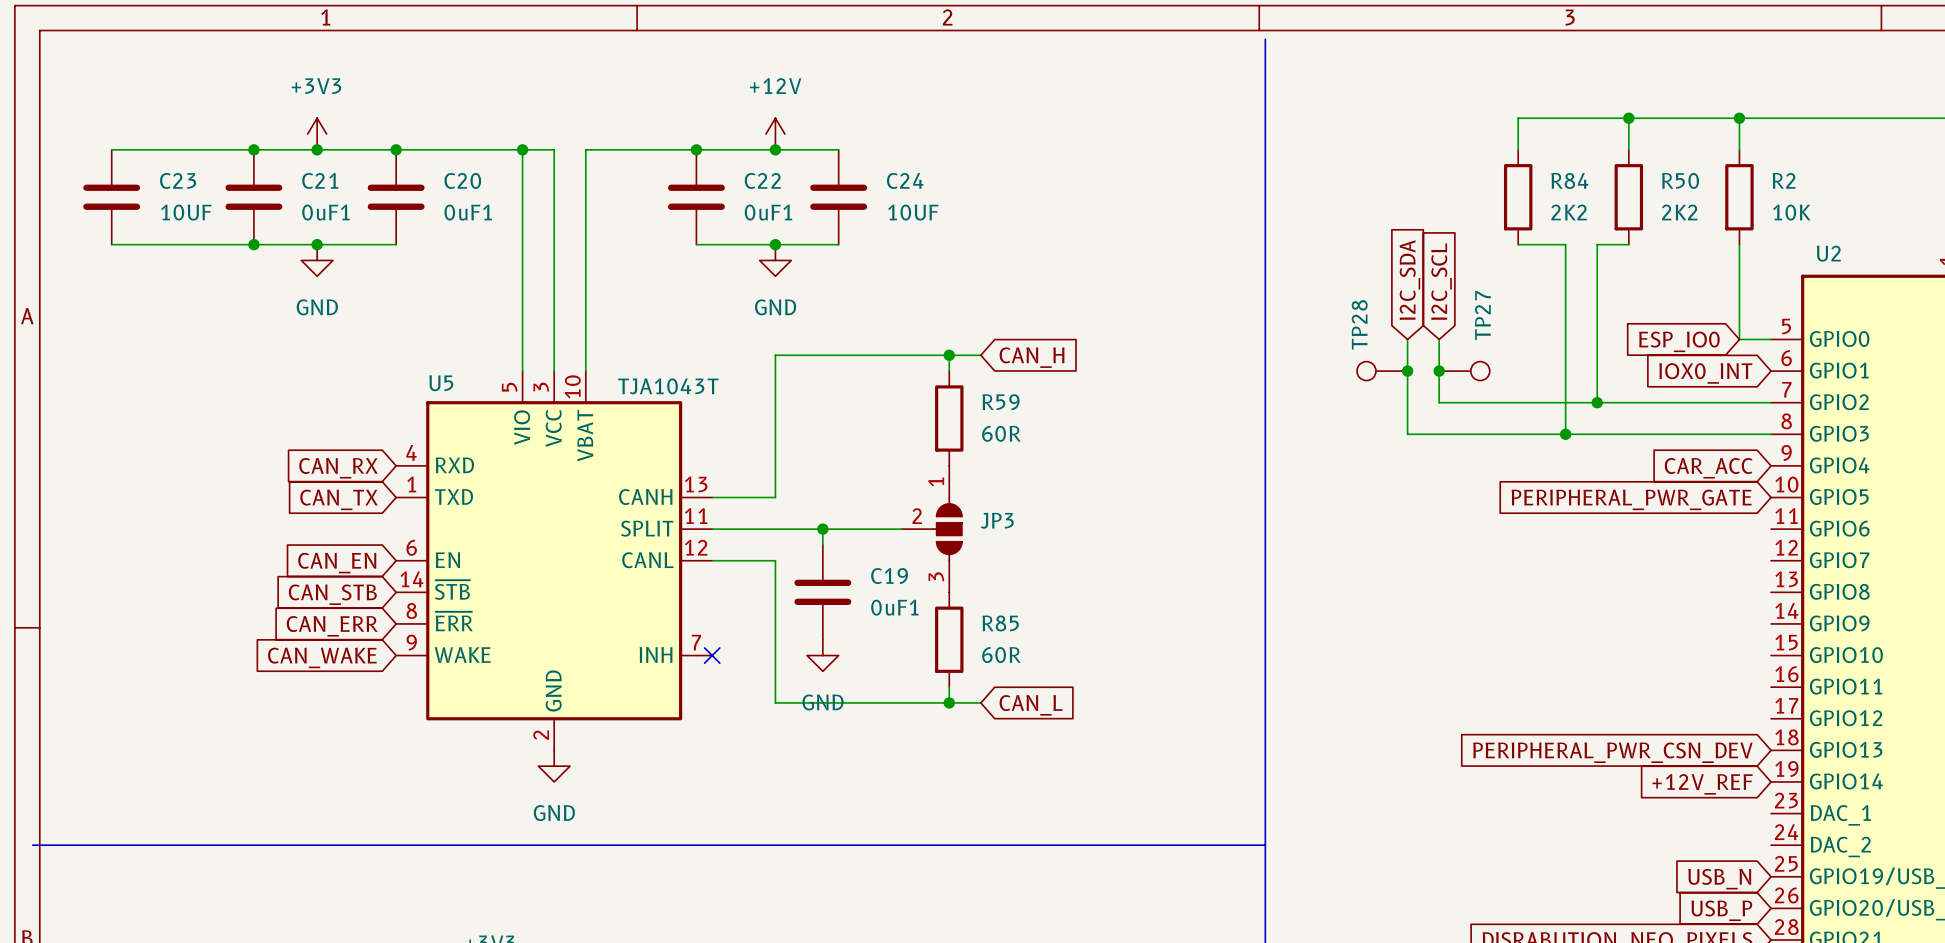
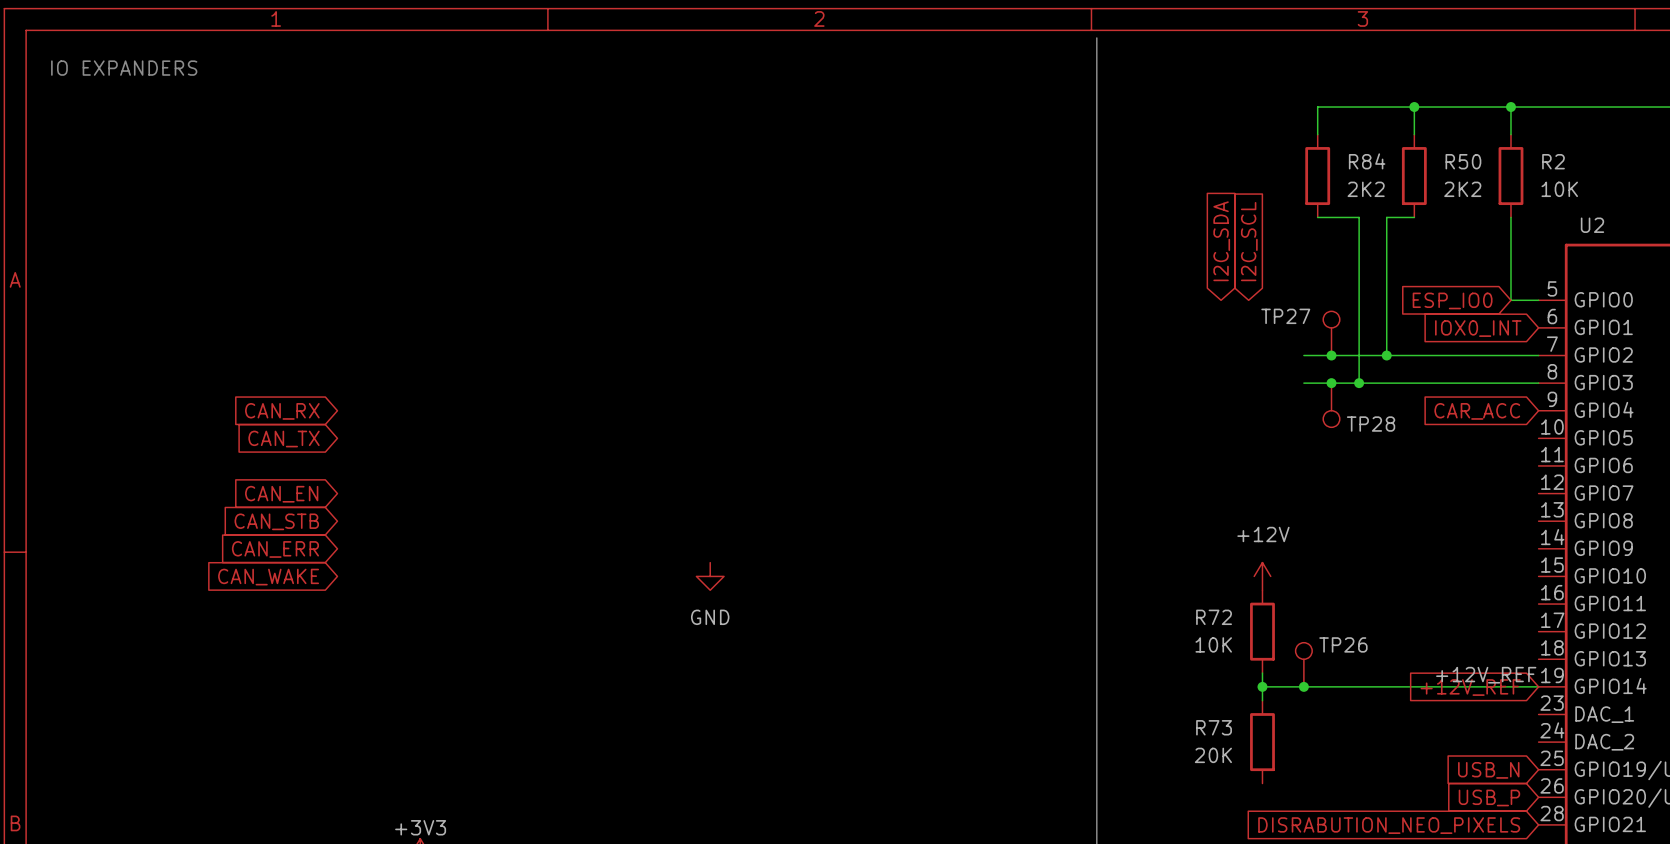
text: none -> IO EXPANDERS (124, 68)
power symbol: +3V3 (317, 134) -> none
power symbol: +12V (775, 134) -> none
wire: (111, 149) (554, 149) (554, 371) -> none
junction: (253, 149) -> none
junction: (317, 149) -> none
junction: (396, 149) -> none
wire: (522, 149) (522, 371) -> none
junction: (522, 149) -> none
junction: (696, 149) -> none
junction: (775, 149) -> none
wire: (838, 149) (585, 149) (585, 371) -> none
C23: 10UF (111, 197) -> none
C21: 0uF1 (253, 197) -> none
C20: 0uF1 (396, 197) -> none
C22: 0uF1 (696, 197) -> none
C24: 10UF (838, 197) -> none
wire: (111, 244) (396, 244) -> none
junction: (253, 244) -> none
junction: (317, 244) -> none
wire: (696, 244) (838, 244) -> none
junction: (775, 244) -> none
power symbol: GND (317, 260) -> none
power symbol: GND (775, 260) -> none
TP28 name position: TP28 (1359, 324) -> TP28 (1371, 424)
wire: (1407, 339) (1407, 434) (1502, 434) -> none
wire: (1439, 339) (1439, 402) (1502, 402) -> none
wire: (949, 355) (949, 371) -> none
junction: (949, 355) -> none
wire: (980, 355) (775, 355) (775, 497) (712, 497) -> none
global label: CAN_H (1031, 357) -> none
TP28 rotation: 0° (1366, 371) -> 90° counterclockwise (1331, 419)
TP28 position: (1382, 371) -> (1331, 405)
junction: (1407, 371) -> none
junction: (1439, 371) -> none
TP27 position: (1464, 371) -> (1331, 333)
TP27 rotation: 0° (1480, 371) -> 90° counterclockwise (1331, 319)
junction: none -> (1331, 355)
R59: 60R (949, 418) -> none
junction: none -> (1331, 383)
global label: PERIPHERAL_PWR_GATE (1631, 499) -> none
wire: (712, 529) (901, 529) -> none
wire: (822, 529) (822, 544) -> none
junction: (822, 529) -> none
JP3: (931, 529) -> none
U5: TJA1043T (554, 560) -> none
wire: (712, 560) (775, 560) (775, 702) (980, 702) -> none
C19: 0uF1 (822, 592) -> none
R85: 60R (949, 639) -> none
no-connect mark: (712, 655) -> none
power symbol: none -> +12V (1262, 576)
wire: (949, 687) (949, 702) -> none
junction: (949, 702) -> none
global label: CAN_L (1031, 705) -> none
R72: none -> 10K (1262, 631)
global label: PERIPHERAL_PWR_CSN_DEV (1612, 752) -> none
TP26: none -> (1303, 664)
power symbol: GND (554, 766) -> none
wire: none -> (1262, 673) (1262, 700)
label: none -> +12V_REF (1486, 675)
wire: none -> (1262, 686) (1538, 686)
junction: none -> (1262, 686)
junction: none -> (1303, 686)
line: (32, 845) (1265, 845) -> none
R73: none -> 20K (1262, 742)

